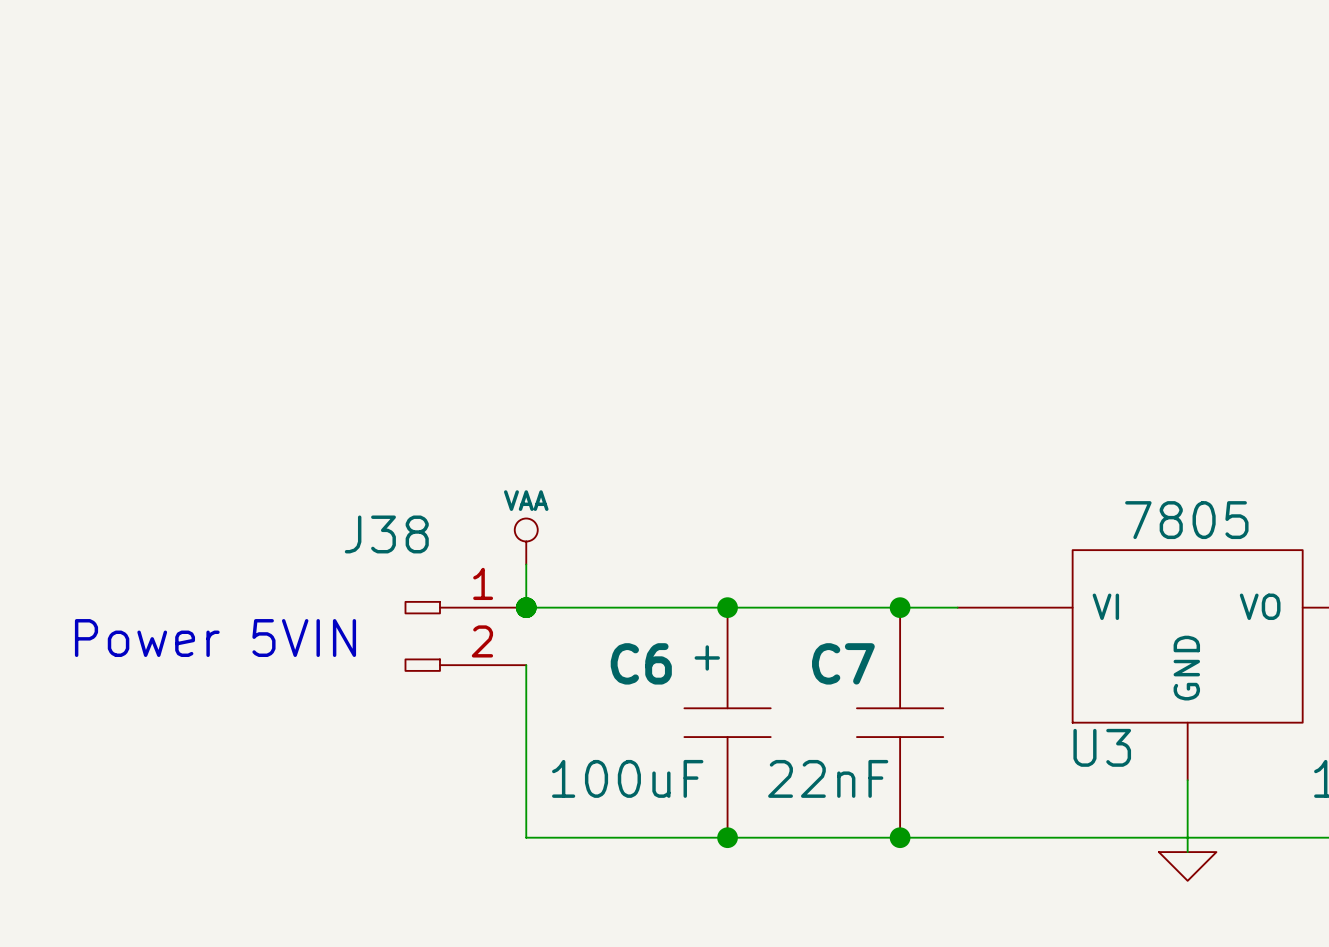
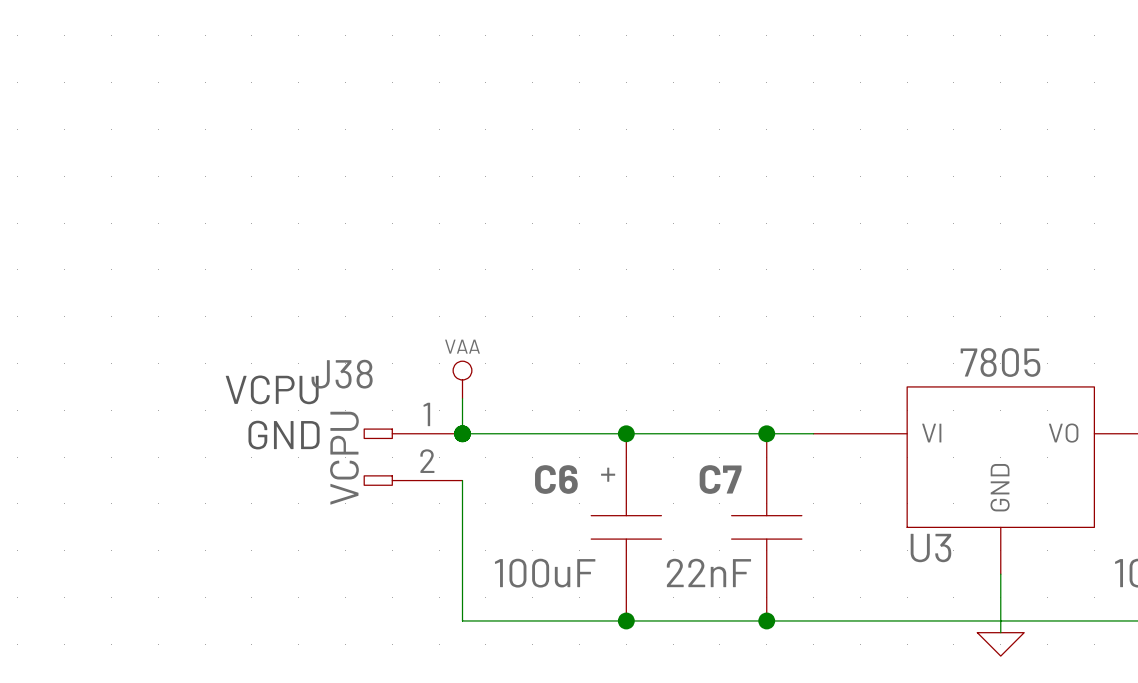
text: none -> VCPU (272, 389)
text: none -> GND (284, 435)
text: Power 5VIN (215, 638) -> none
J38 value: none -> VCPU (344, 458)

